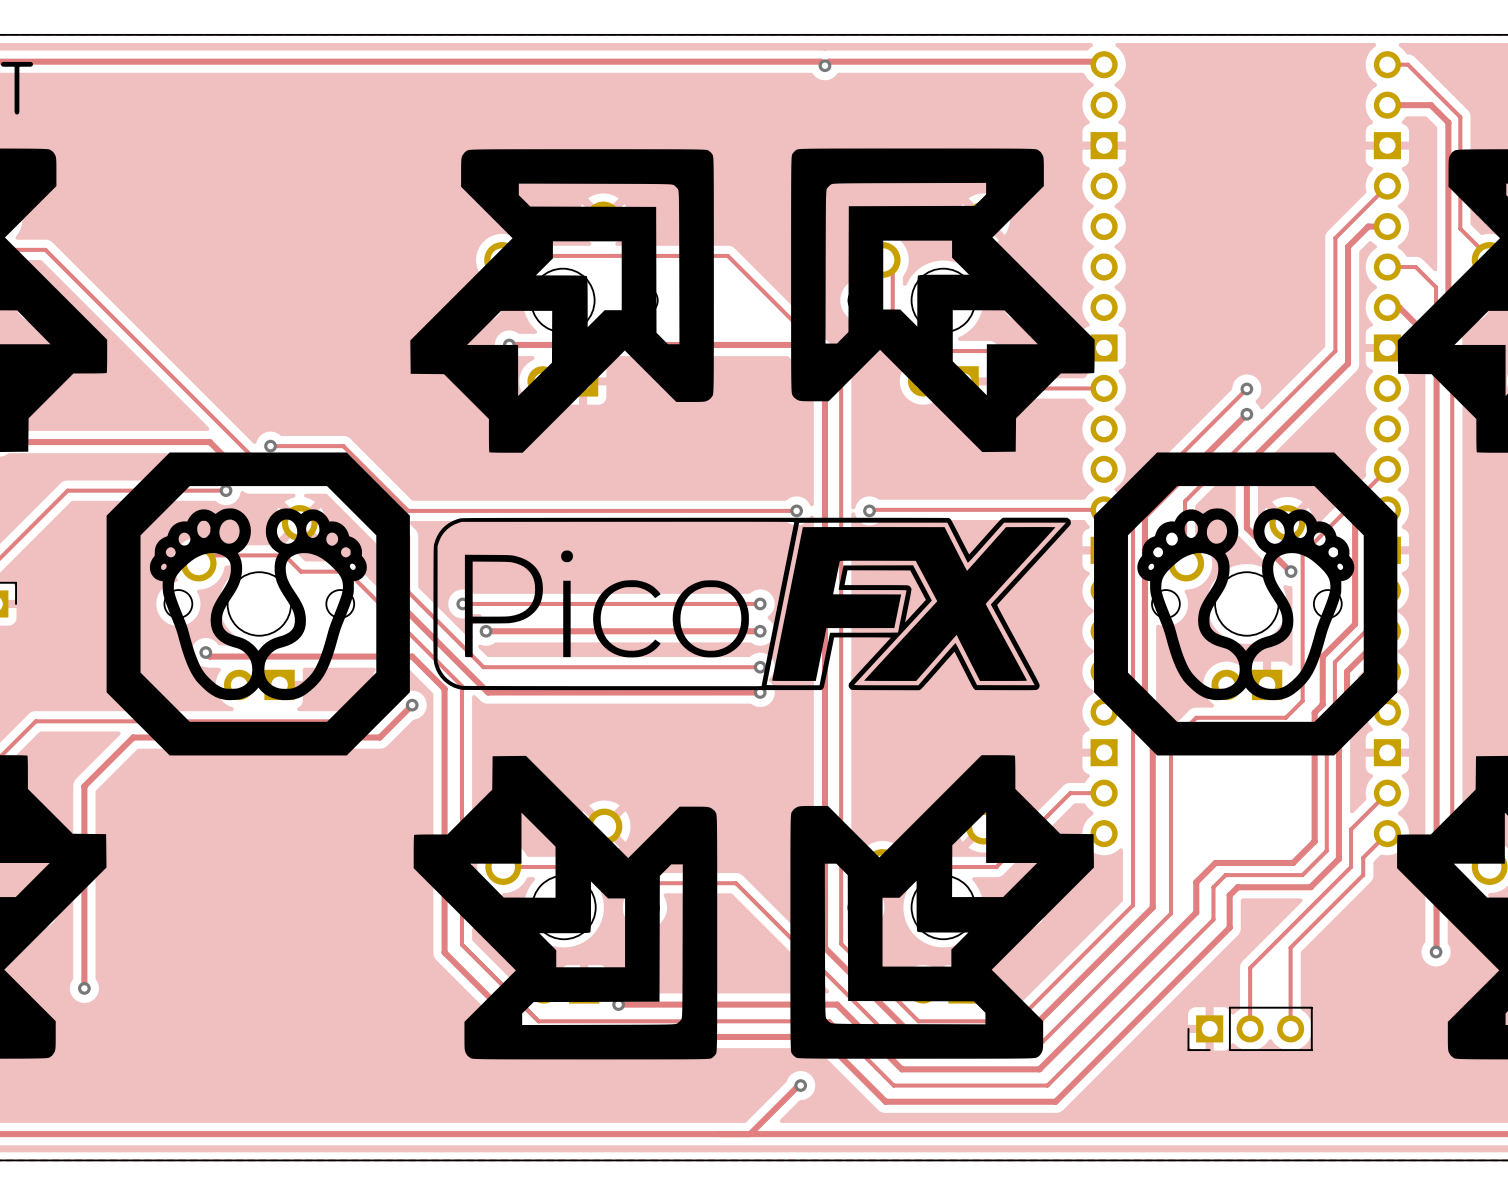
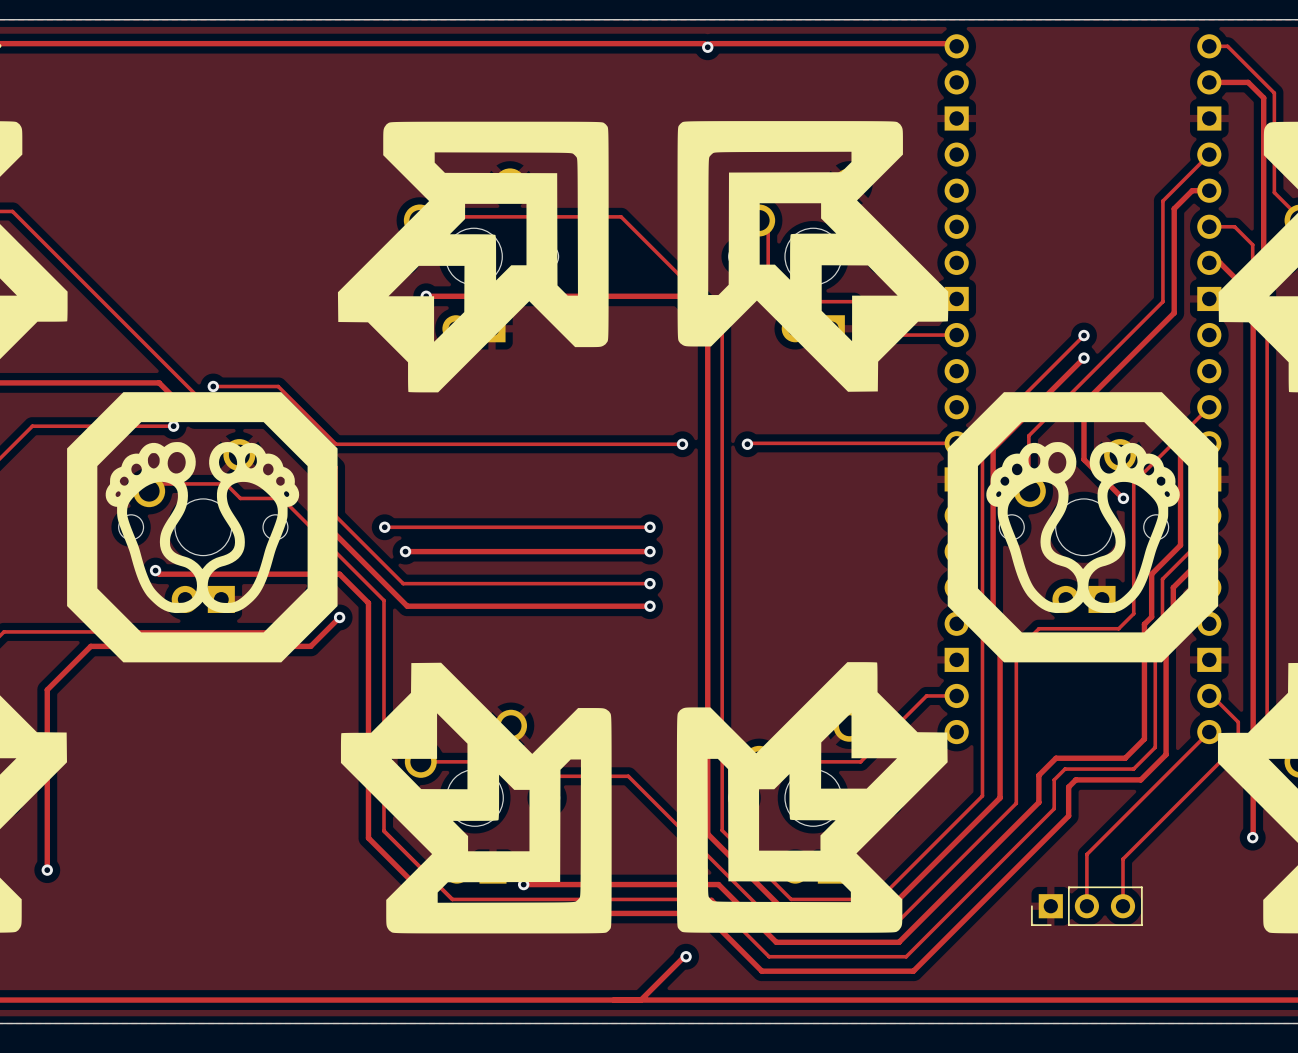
drawing: [433, 517, 1071, 691] -> none
track: (1387, 793) (1351, 829) (1351, 867) (1250, 967) (1250, 970) -> (1209, 695) (1212, 695) (1238, 722) (1238, 743) (1123, 859)
track: (1363, 857) (1363, 875) (1290, 947) (1290, 976) -> (1187, 753) (1086, 854)

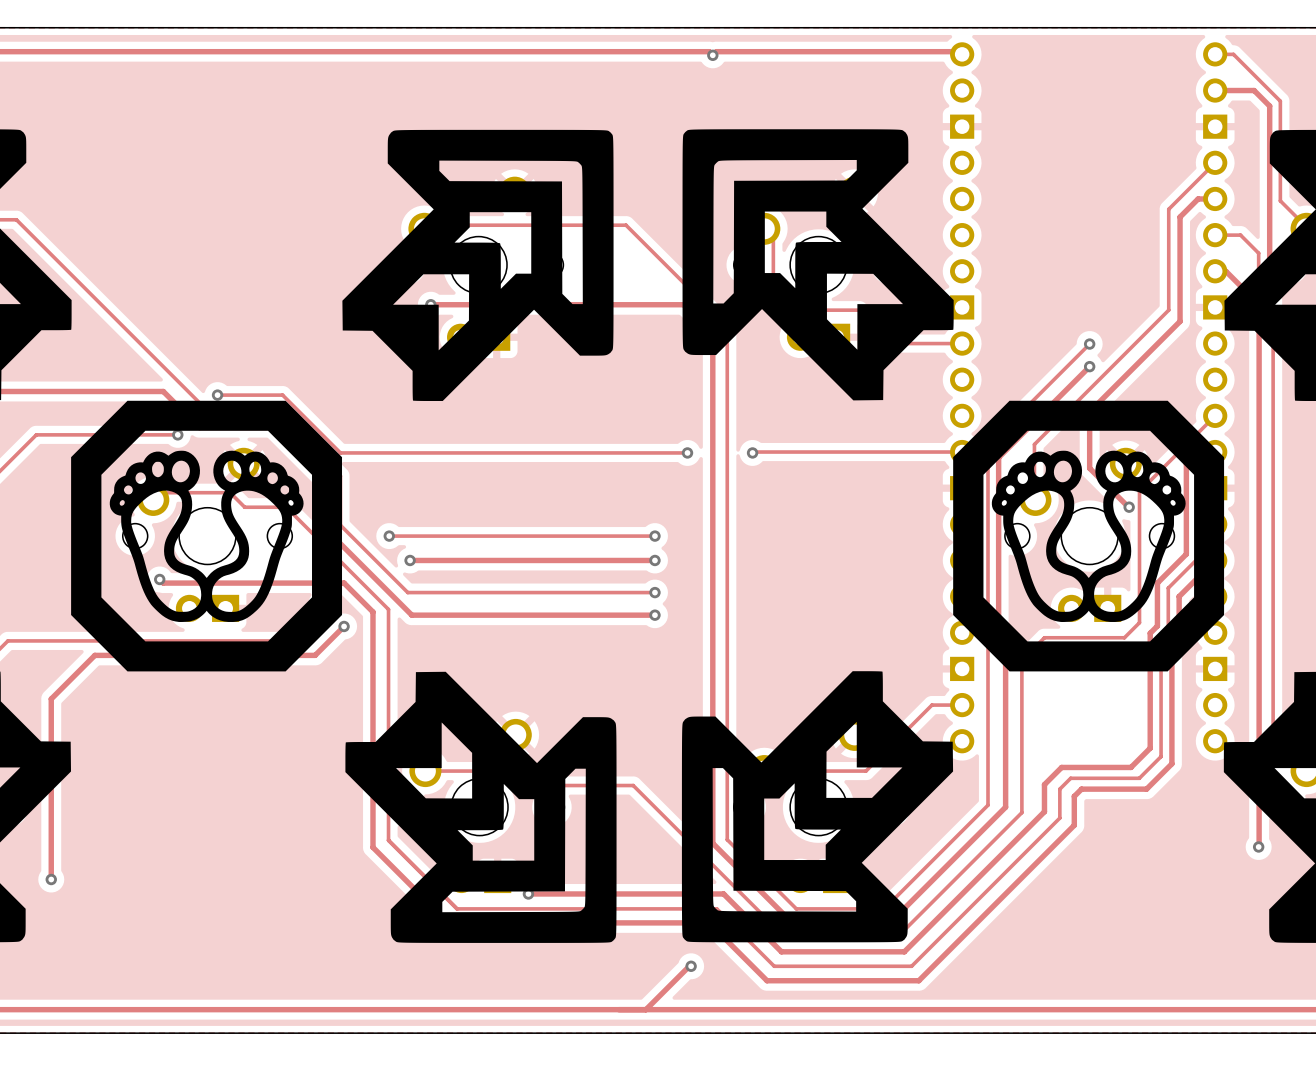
track: (1209, 695) (1212, 695) (1238, 722) (1238, 743) (1123, 859) (1123, 906) -> none
track: (1209, 732) (1086, 854) (1086, 906) -> none
part: (1086, 906) -> none

